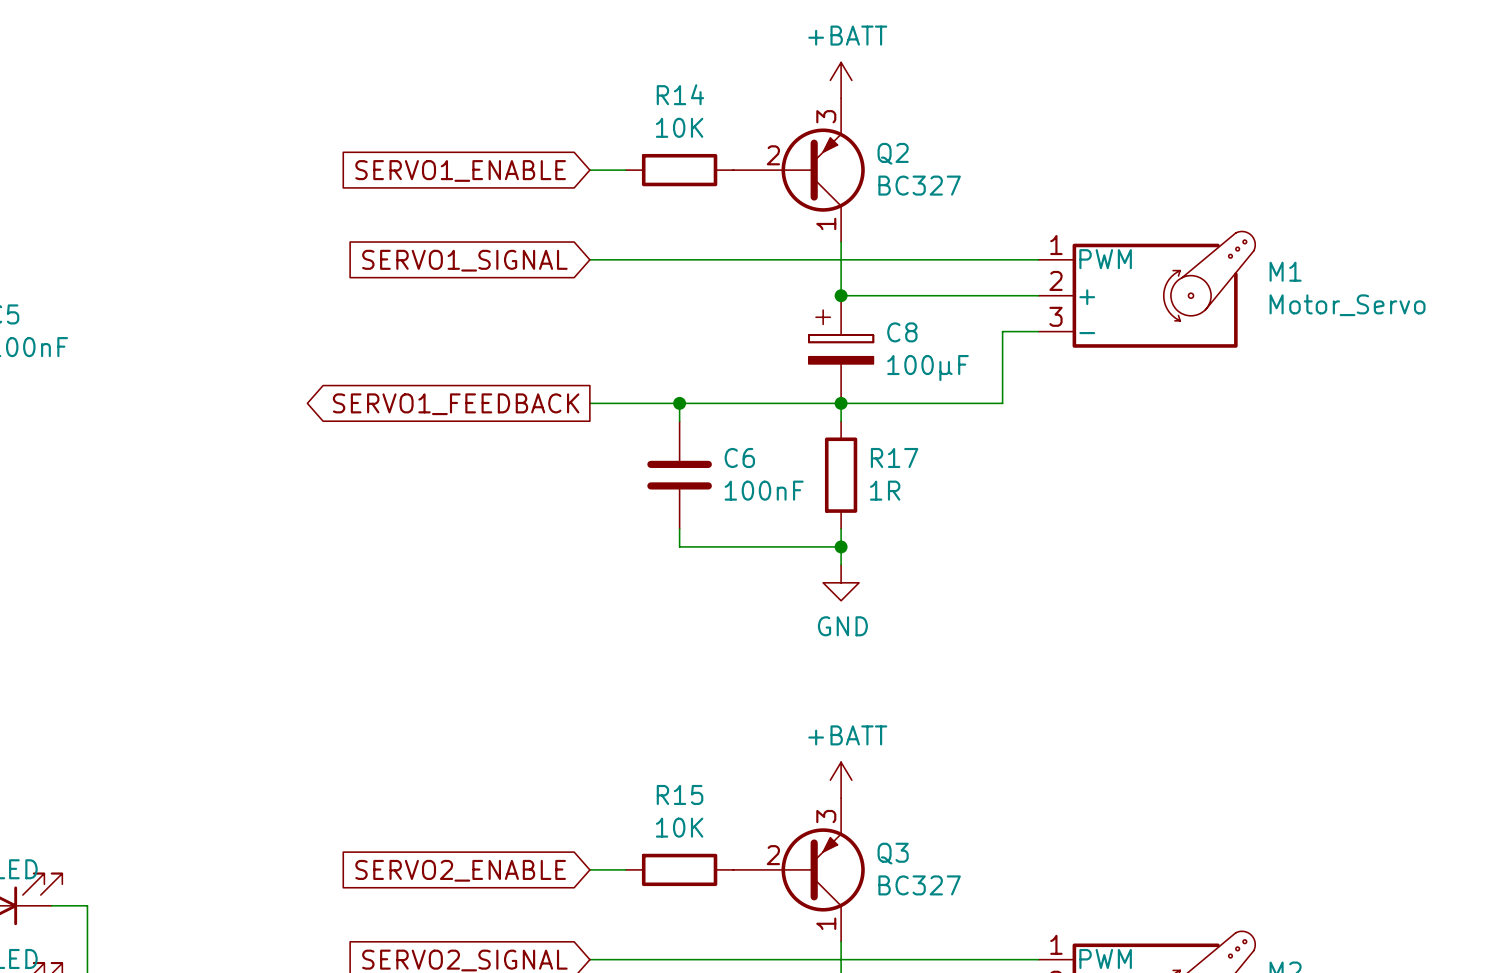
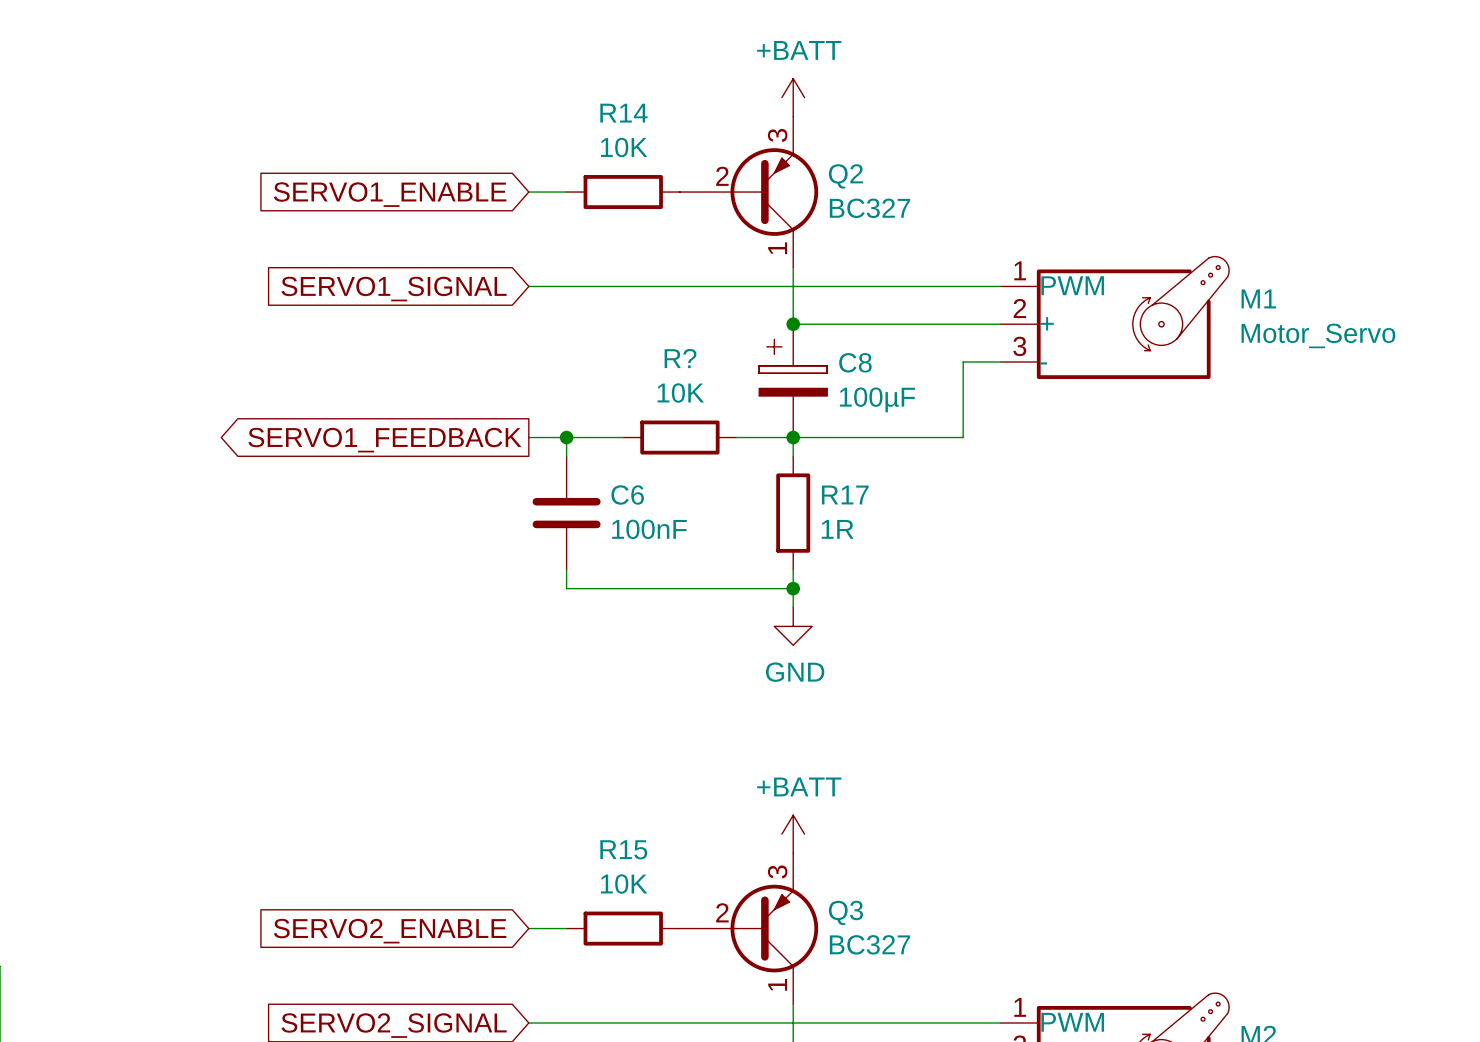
wire: none -> (566, 437) (566, 456)
junction position: (679, 403) -> (566, 437)
R?: none -> 10K (679, 437)
wire: (787, 403) (679, 403) (679, 421) -> none
C6 position: (679, 475) -> (566, 513)
wire: (679, 528) (679, 546) -> (566, 569) (566, 588) (623, 588)

